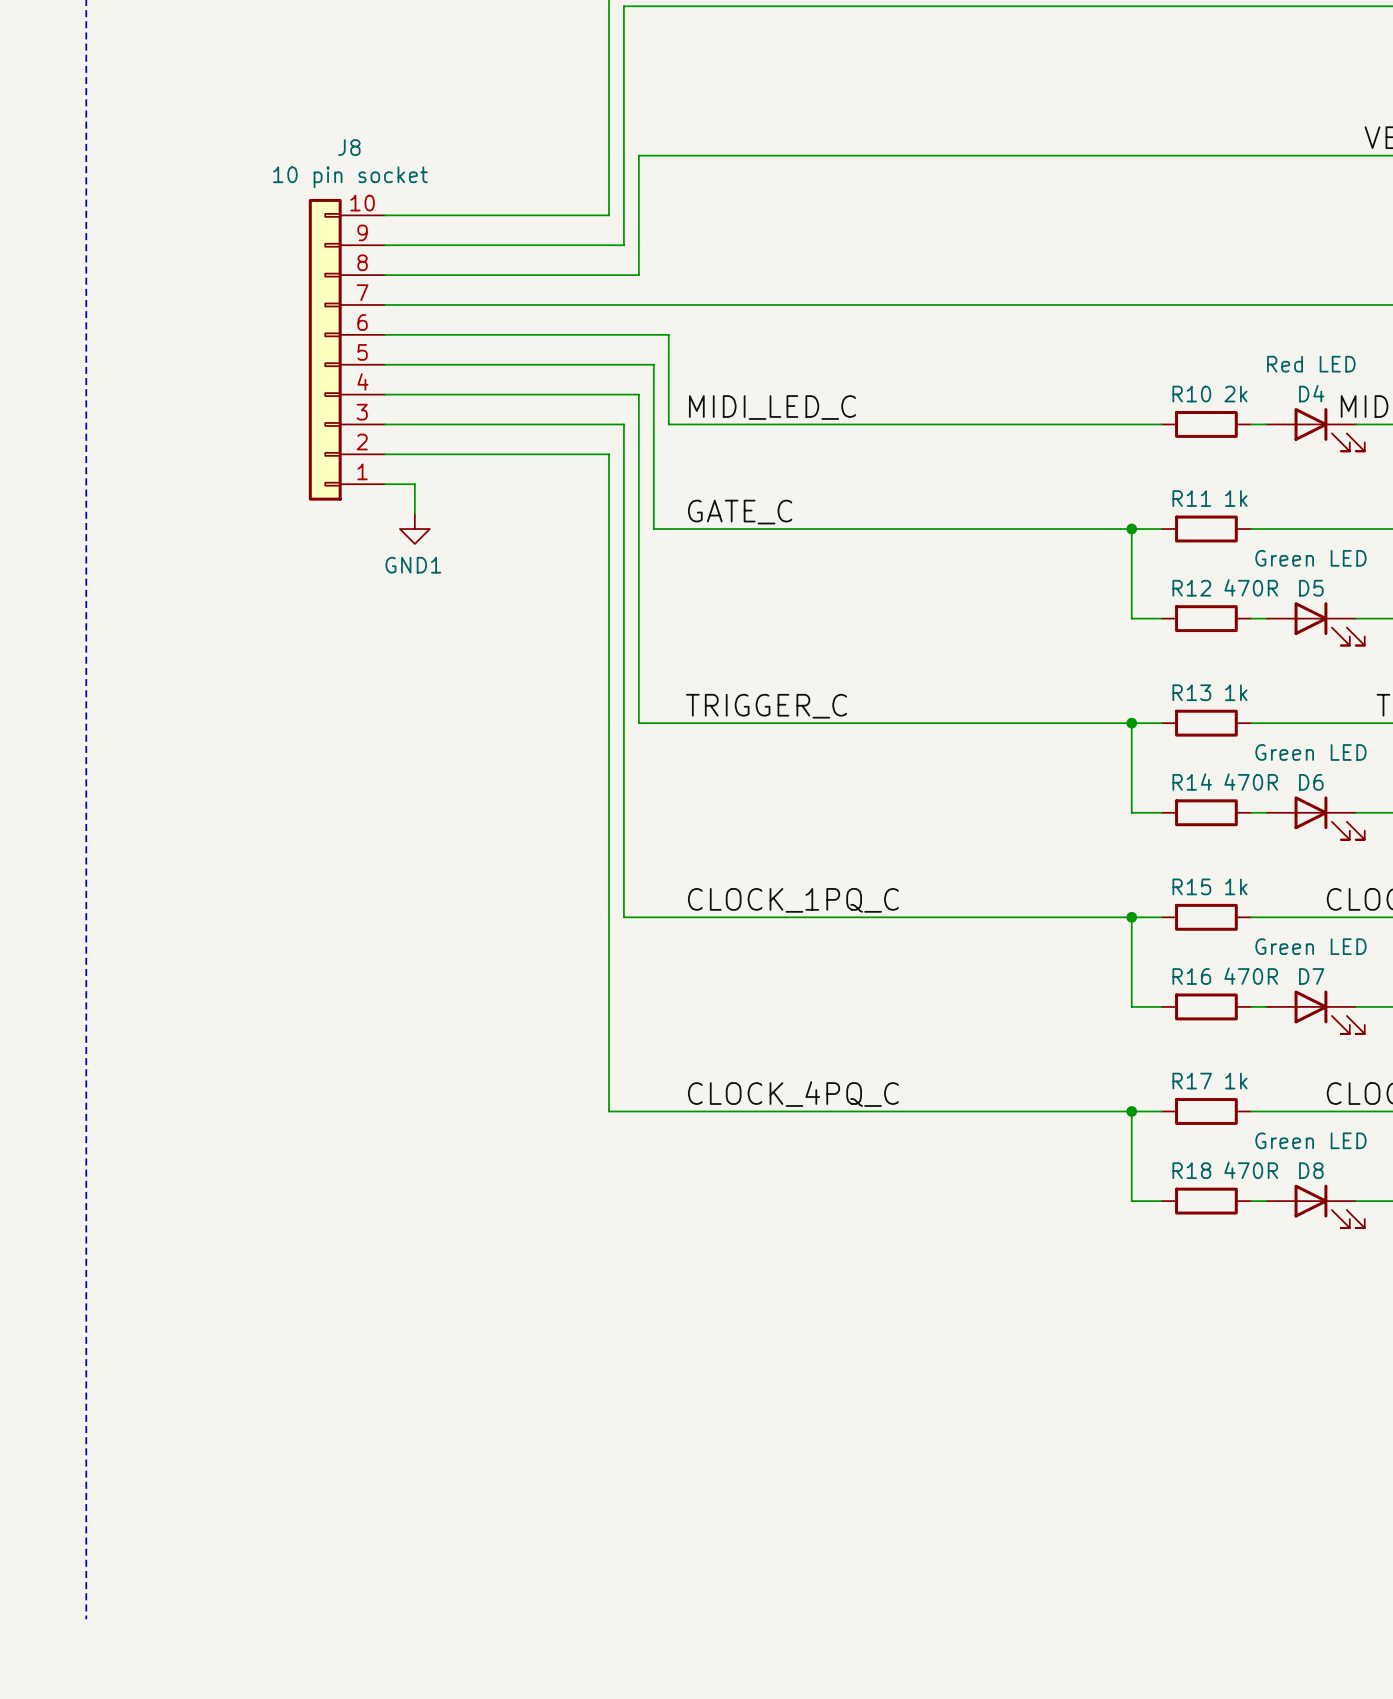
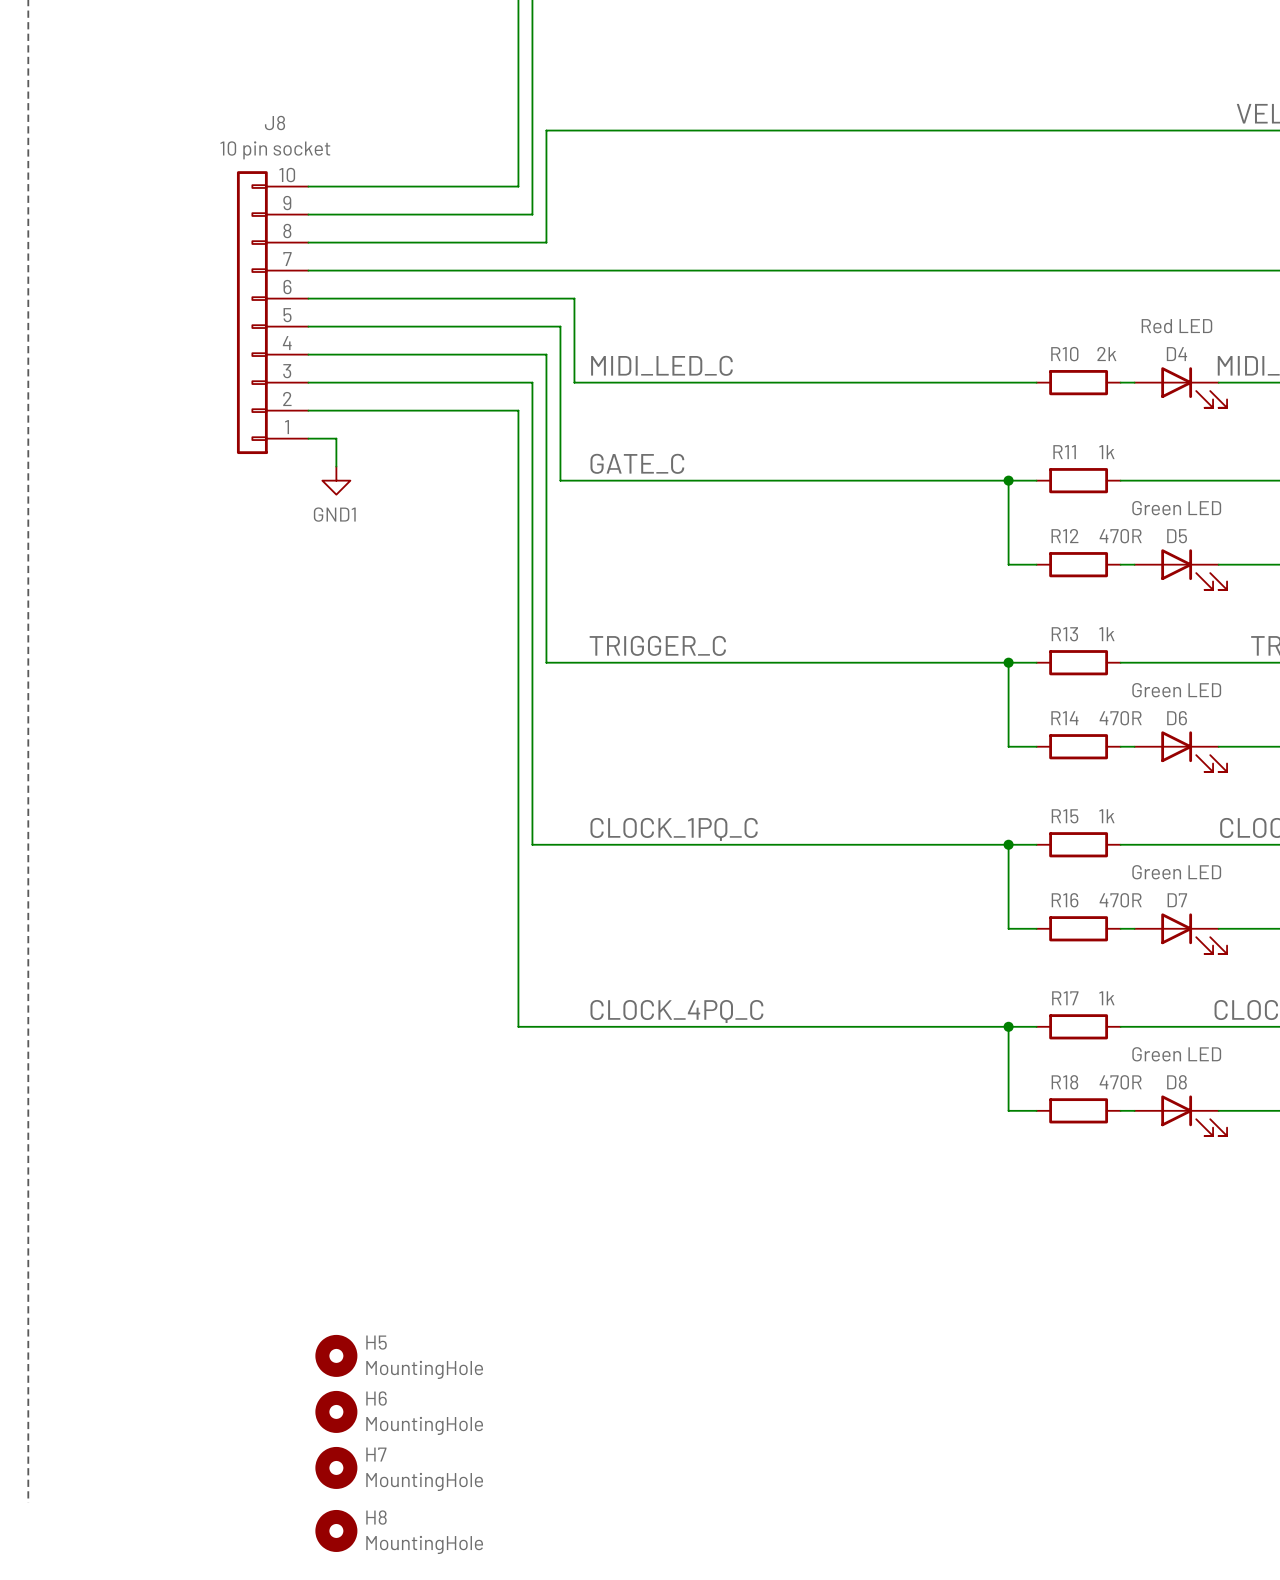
H5: none -> MountingHole (336, 1355)
H6: none -> MountingHole (336, 1411)
H7: none -> MountingHole (336, 1467)
H8: none -> MountingHole (336, 1530)

